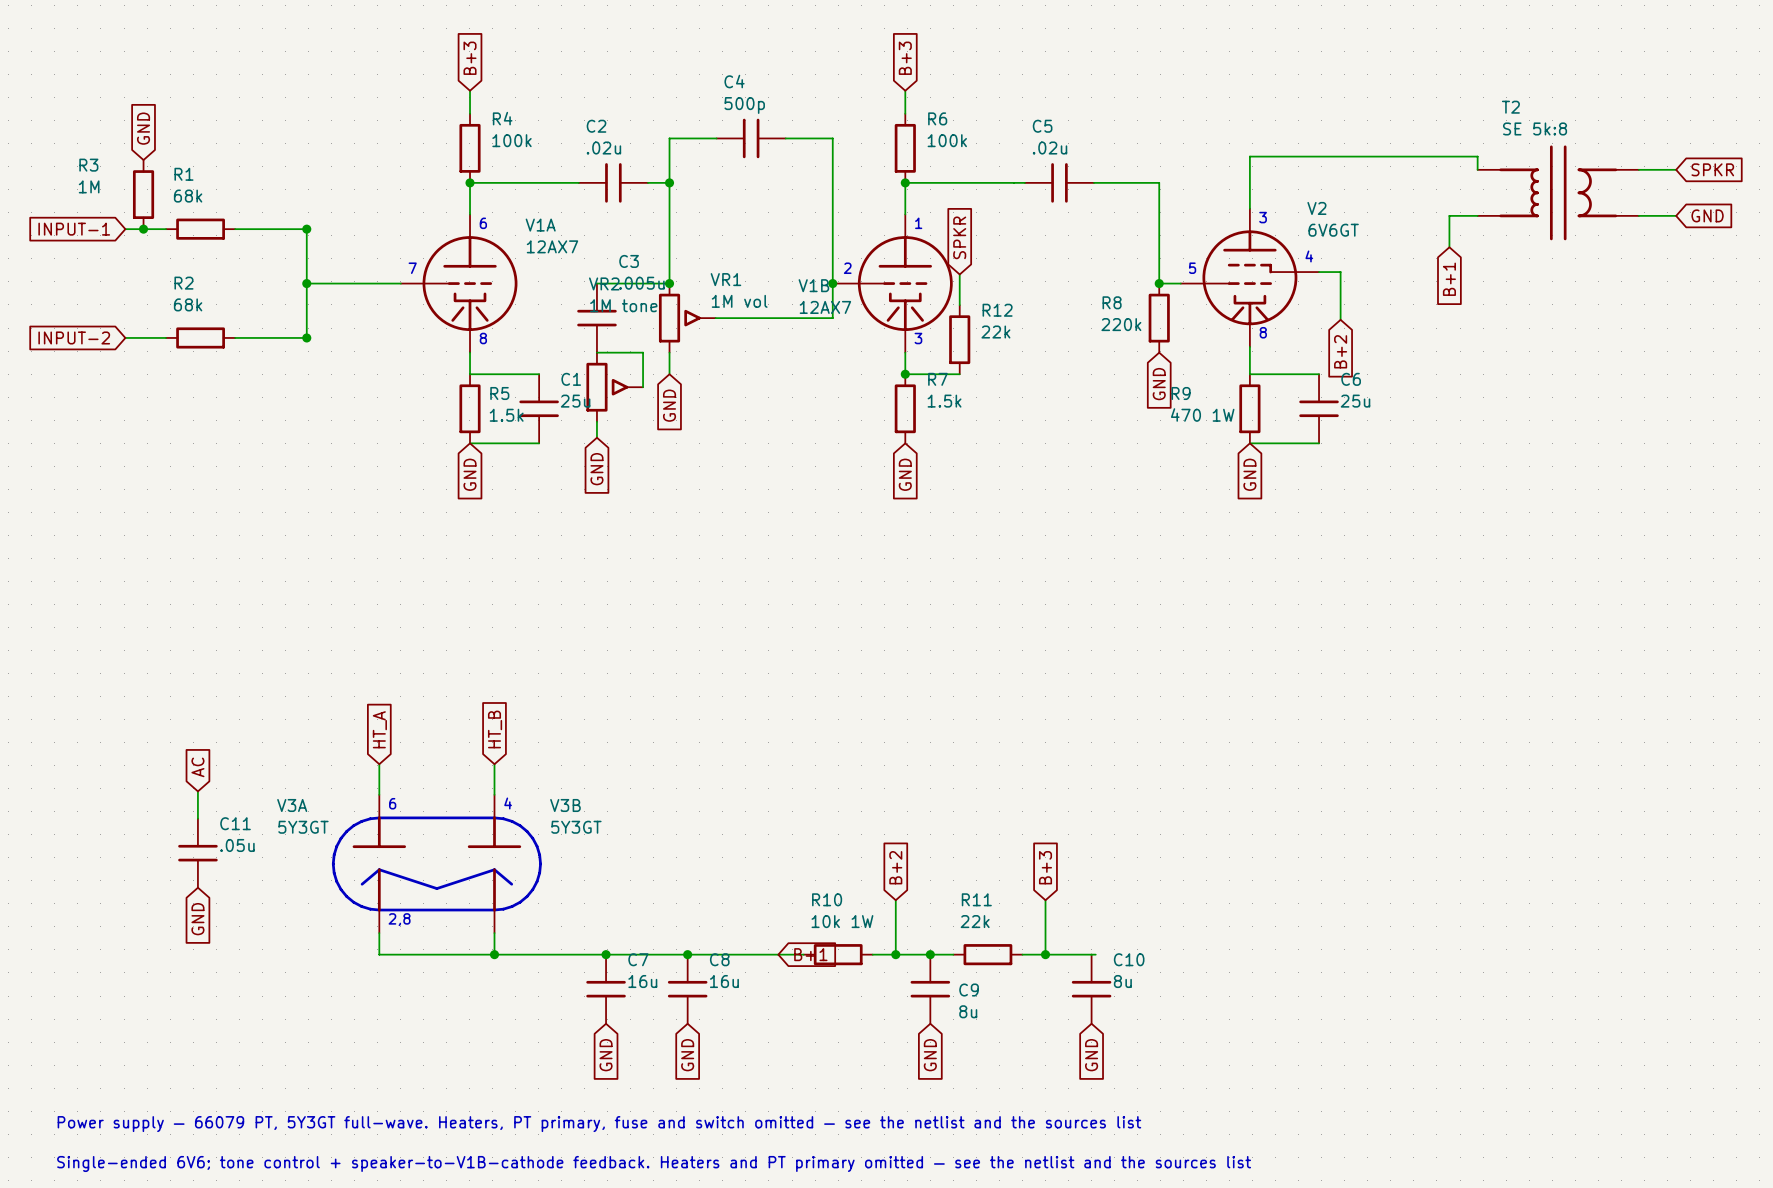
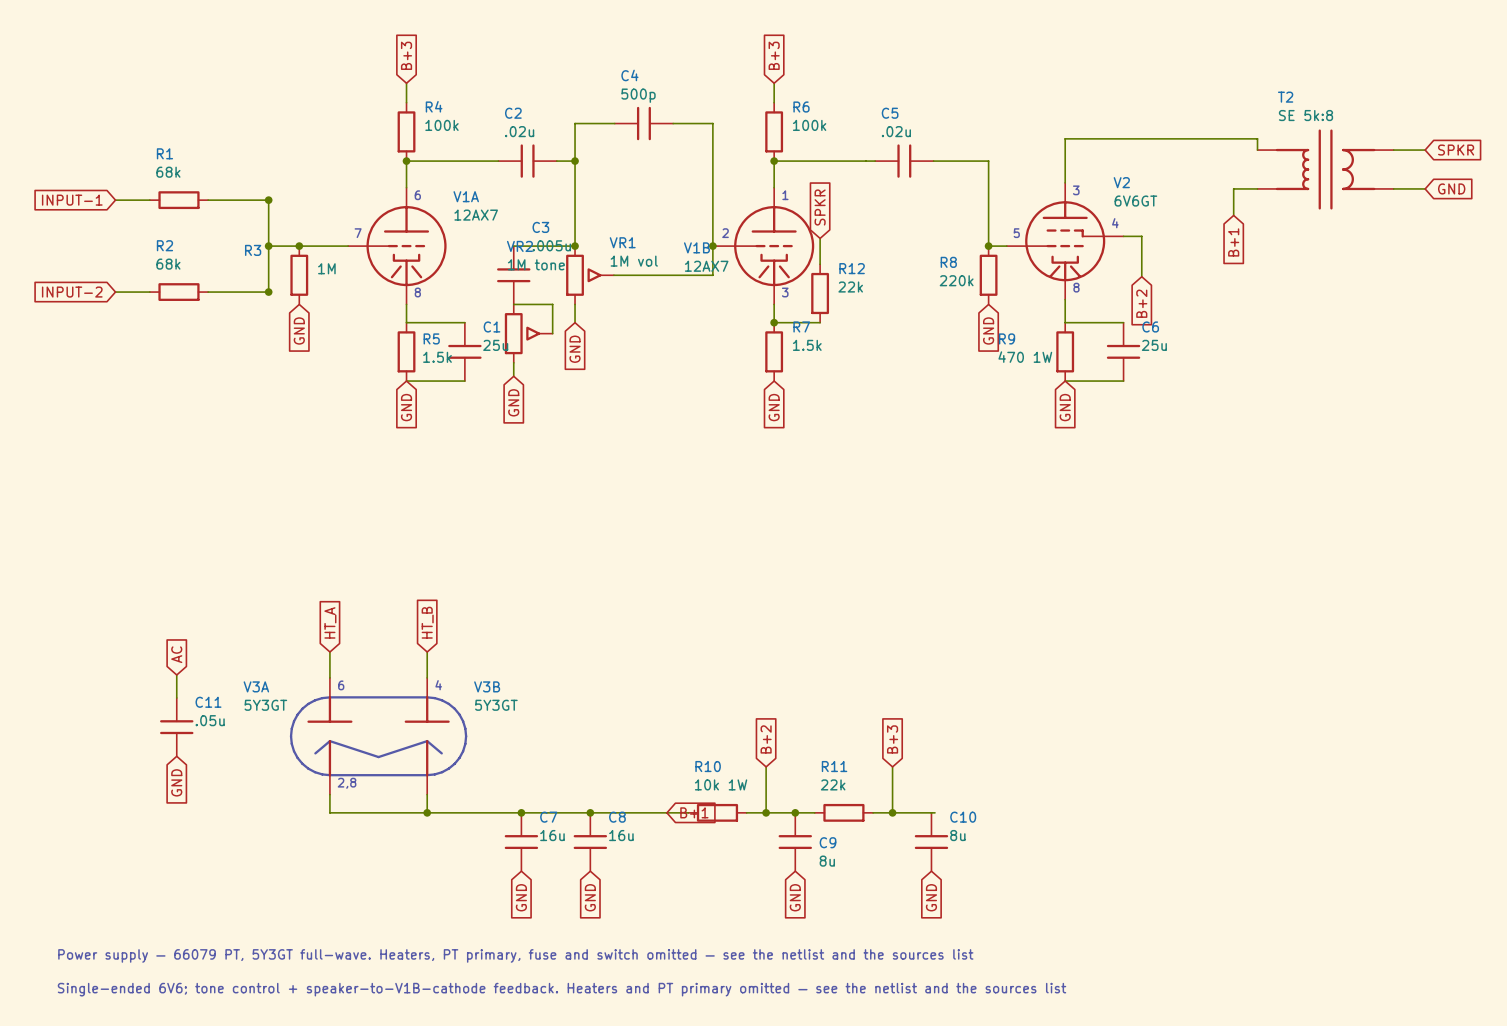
global label: GND (143, 128) -> none
R3 value position: 1M (89, 186) -> 1M (326, 268)
R3 position: (143, 194) -> (299, 275)
junction: (143, 229) -> none
junction: none -> (299, 246)
global label: none -> GND (299, 330)

